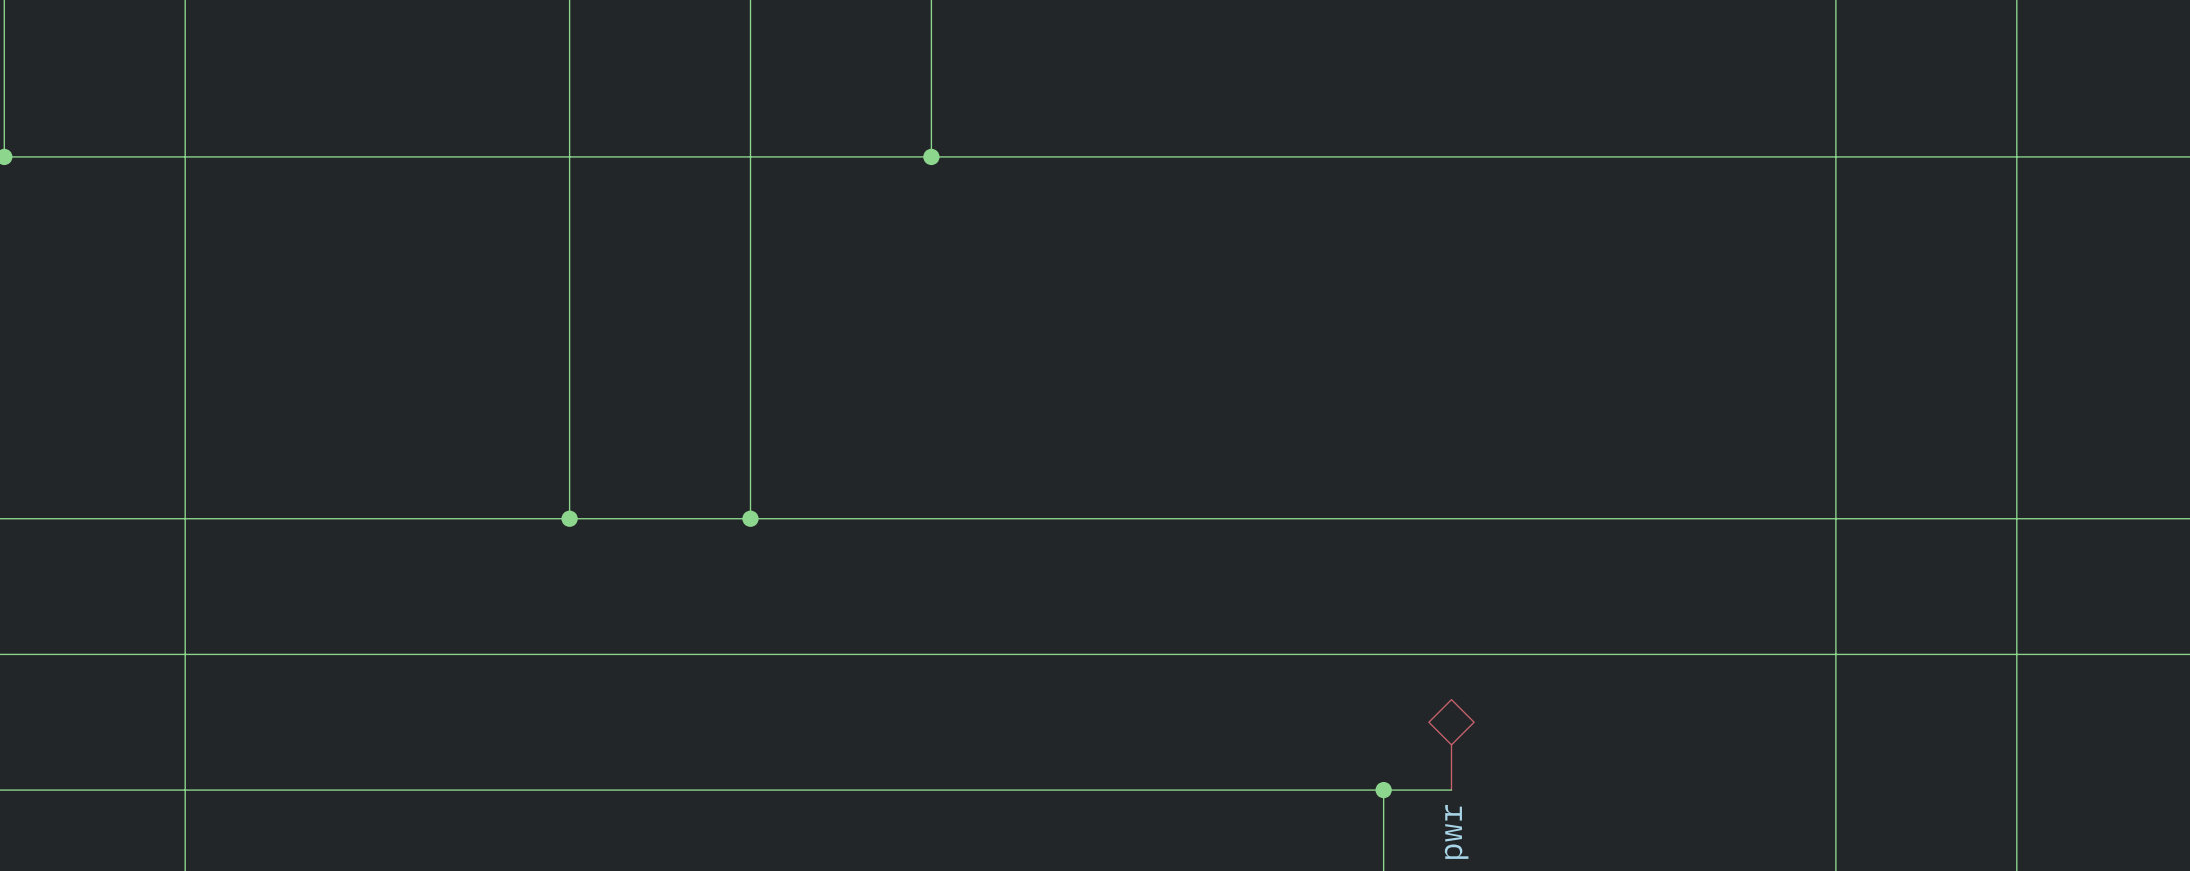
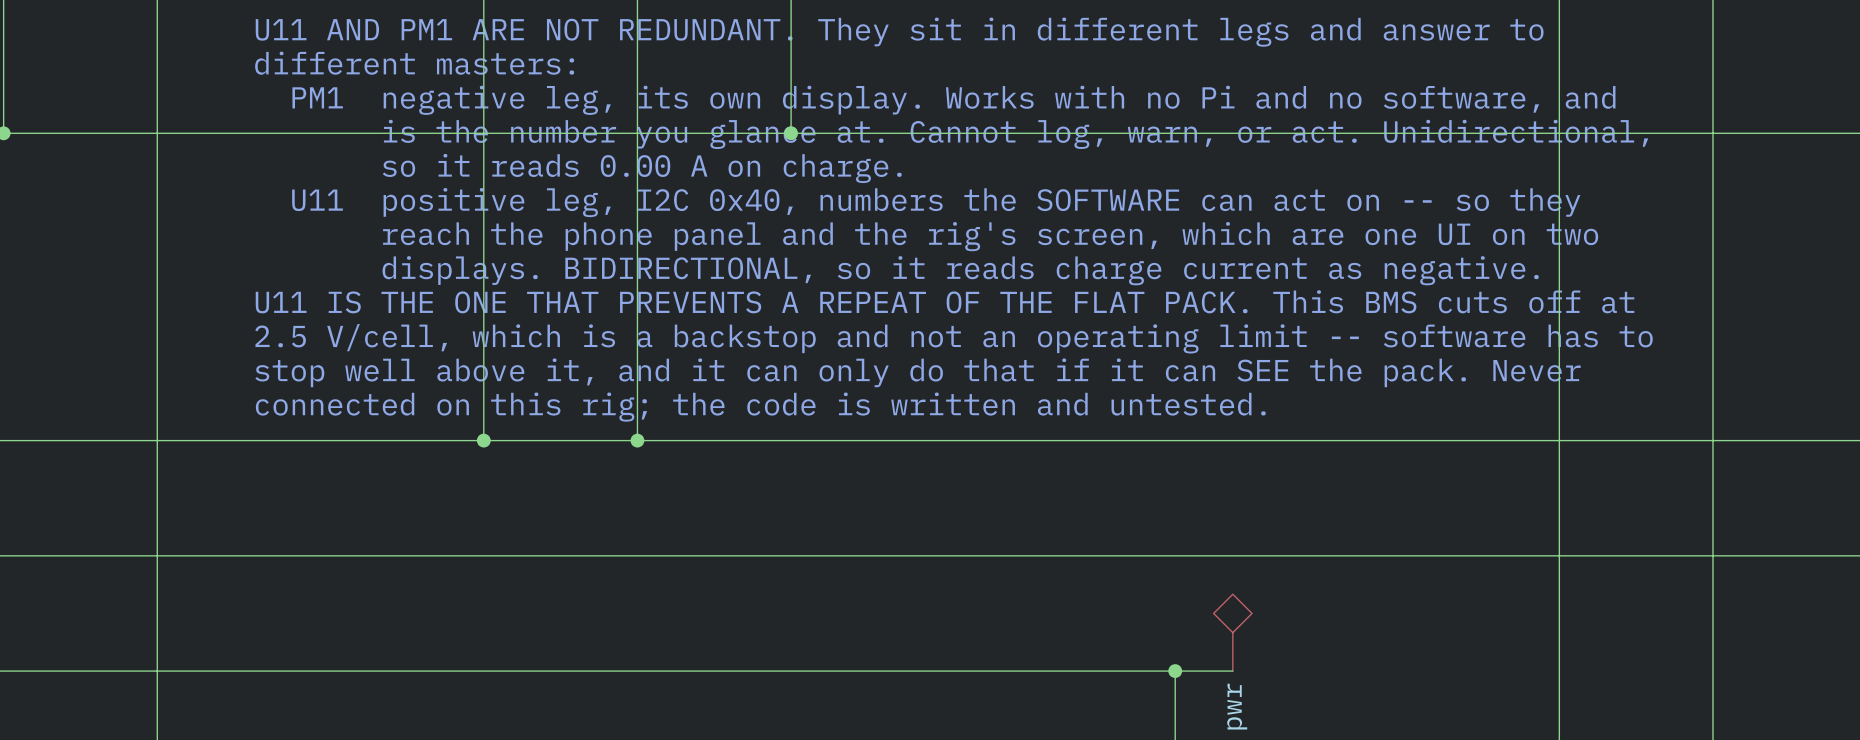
text: none -> U11 AND PM1 ARE NOT REDUNDANT. They sit in different legs and answer to (899, 32)
text: none -> different masters: (414, 63)
text: none -> PM1 negative leg, its own display. Works with no Pi and no software, and (953, 100)
text: none -> is the number you glance at. Cannot log, warn, or act. Unidirectional, (1016, 134)
text: none -> so it reads 0.00 A on charge. (642, 168)
text: none -> U11 positive leg, I2C 0x40, numbers the SOFTWARE can act on -- so they (936, 202)
text: none -> reach the phone panel and the rig's screen, which are one UI on two (990, 236)
text: none -> displays. BIDIRECTIONAL, so it reads charge current as negative. (960, 270)
text: none -> U11 IS THE ONE THAT PREVENTS A REPEAT OF THE FLAT PACK. This BMS cuts off at (945, 301)
text: none -> 2.5 V/cell, which is a backstop and not an operating limit -- software has to (954, 338)
text: none -> stop well above it, and it can only do that if it can SEE the pack. Never (918, 372)
text: none -> connected on this rig; the code is written and untested. (760, 407)

